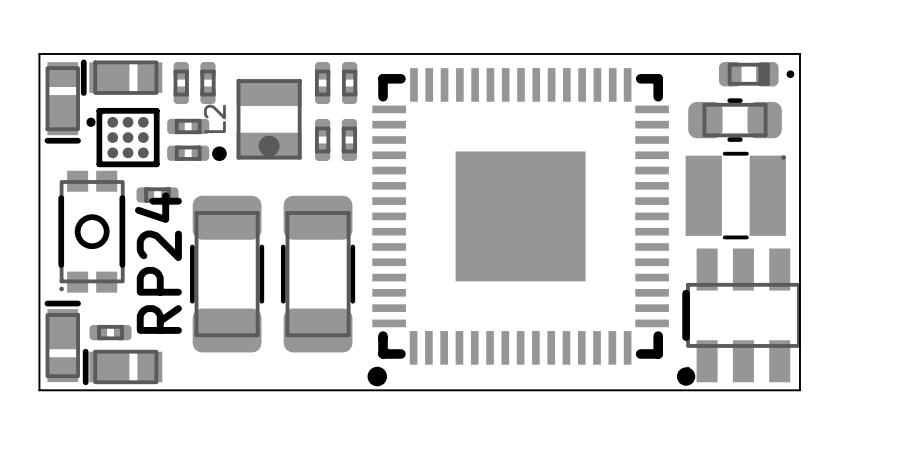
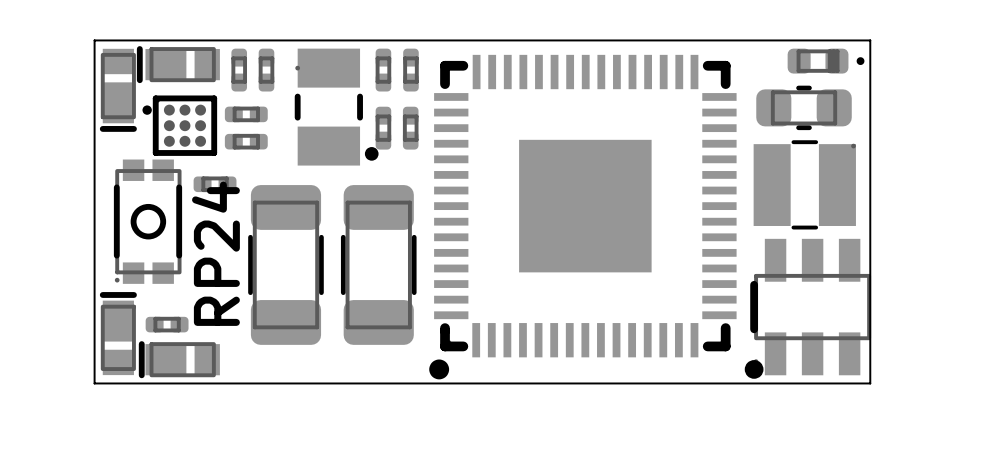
part: none -> (336, 107)
L2: (256, 120) -> none

